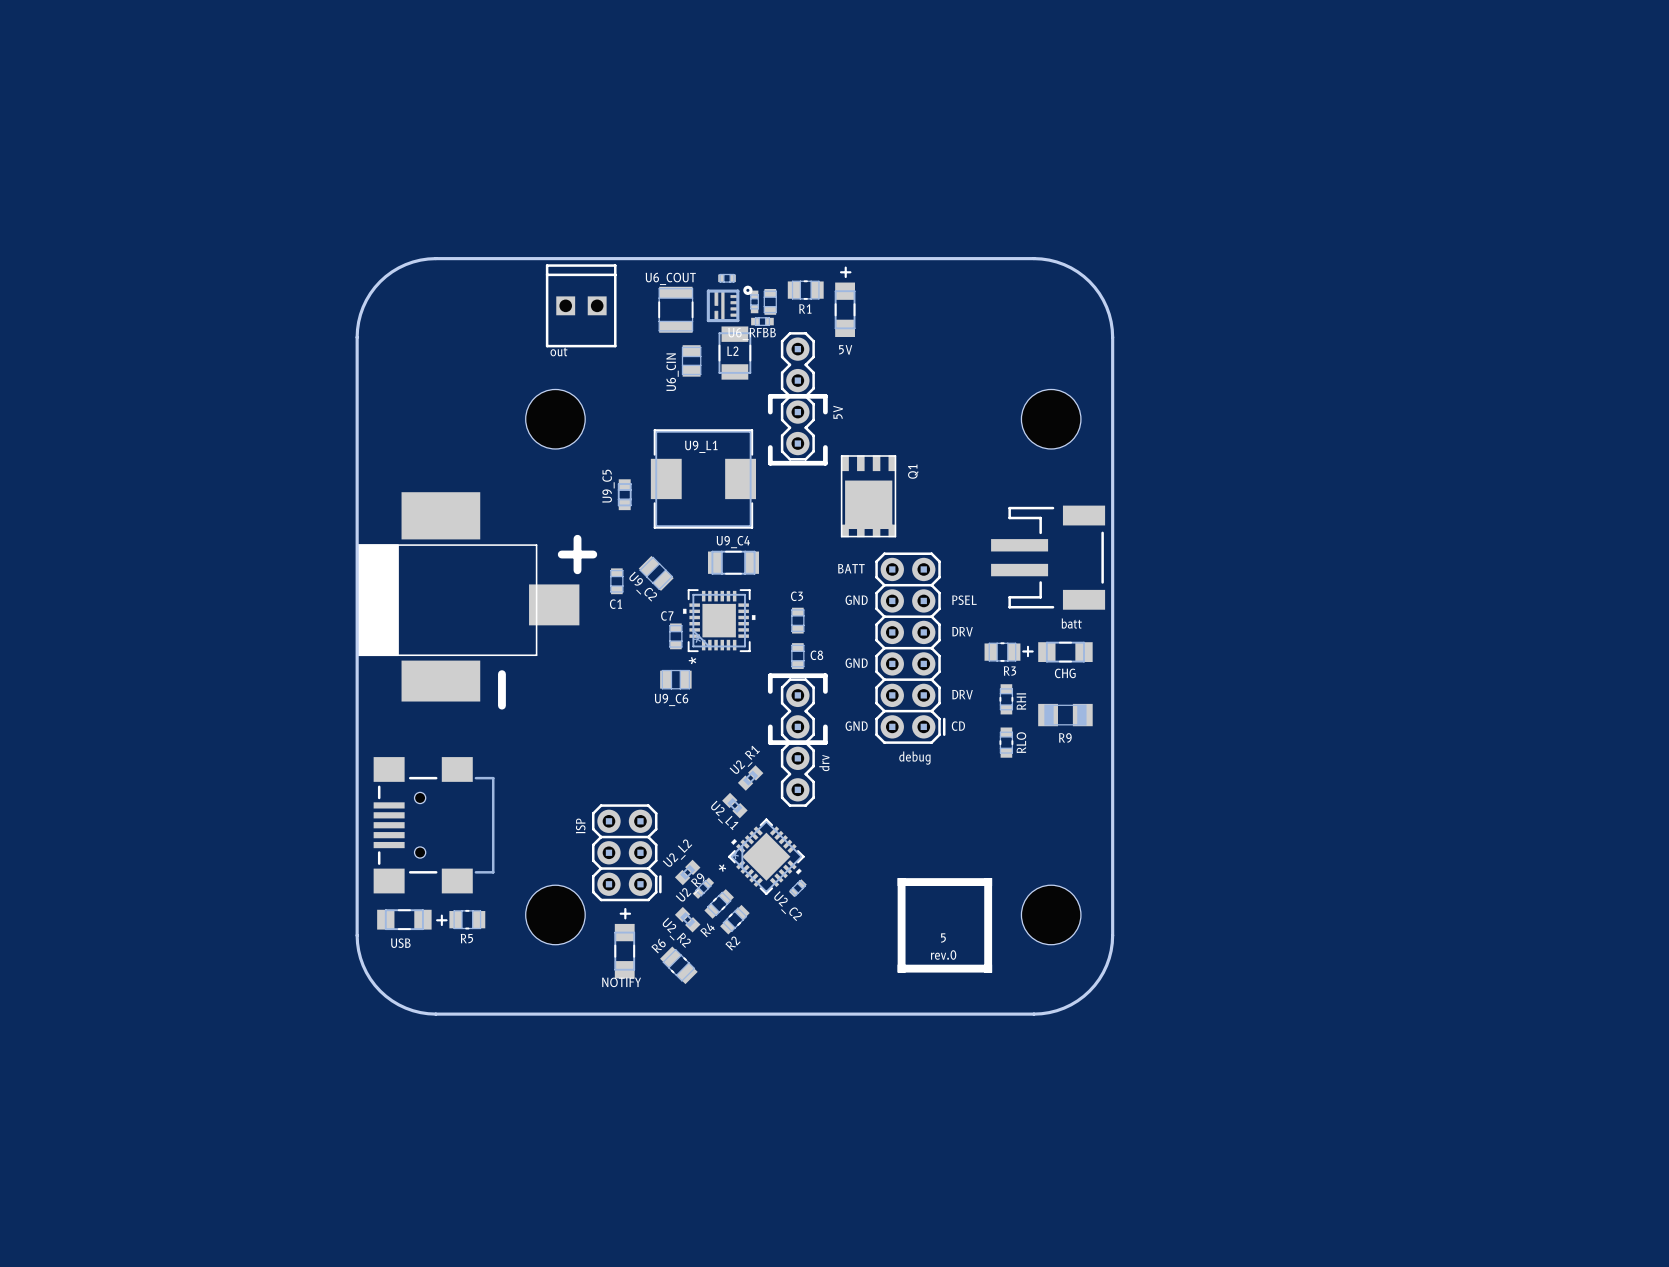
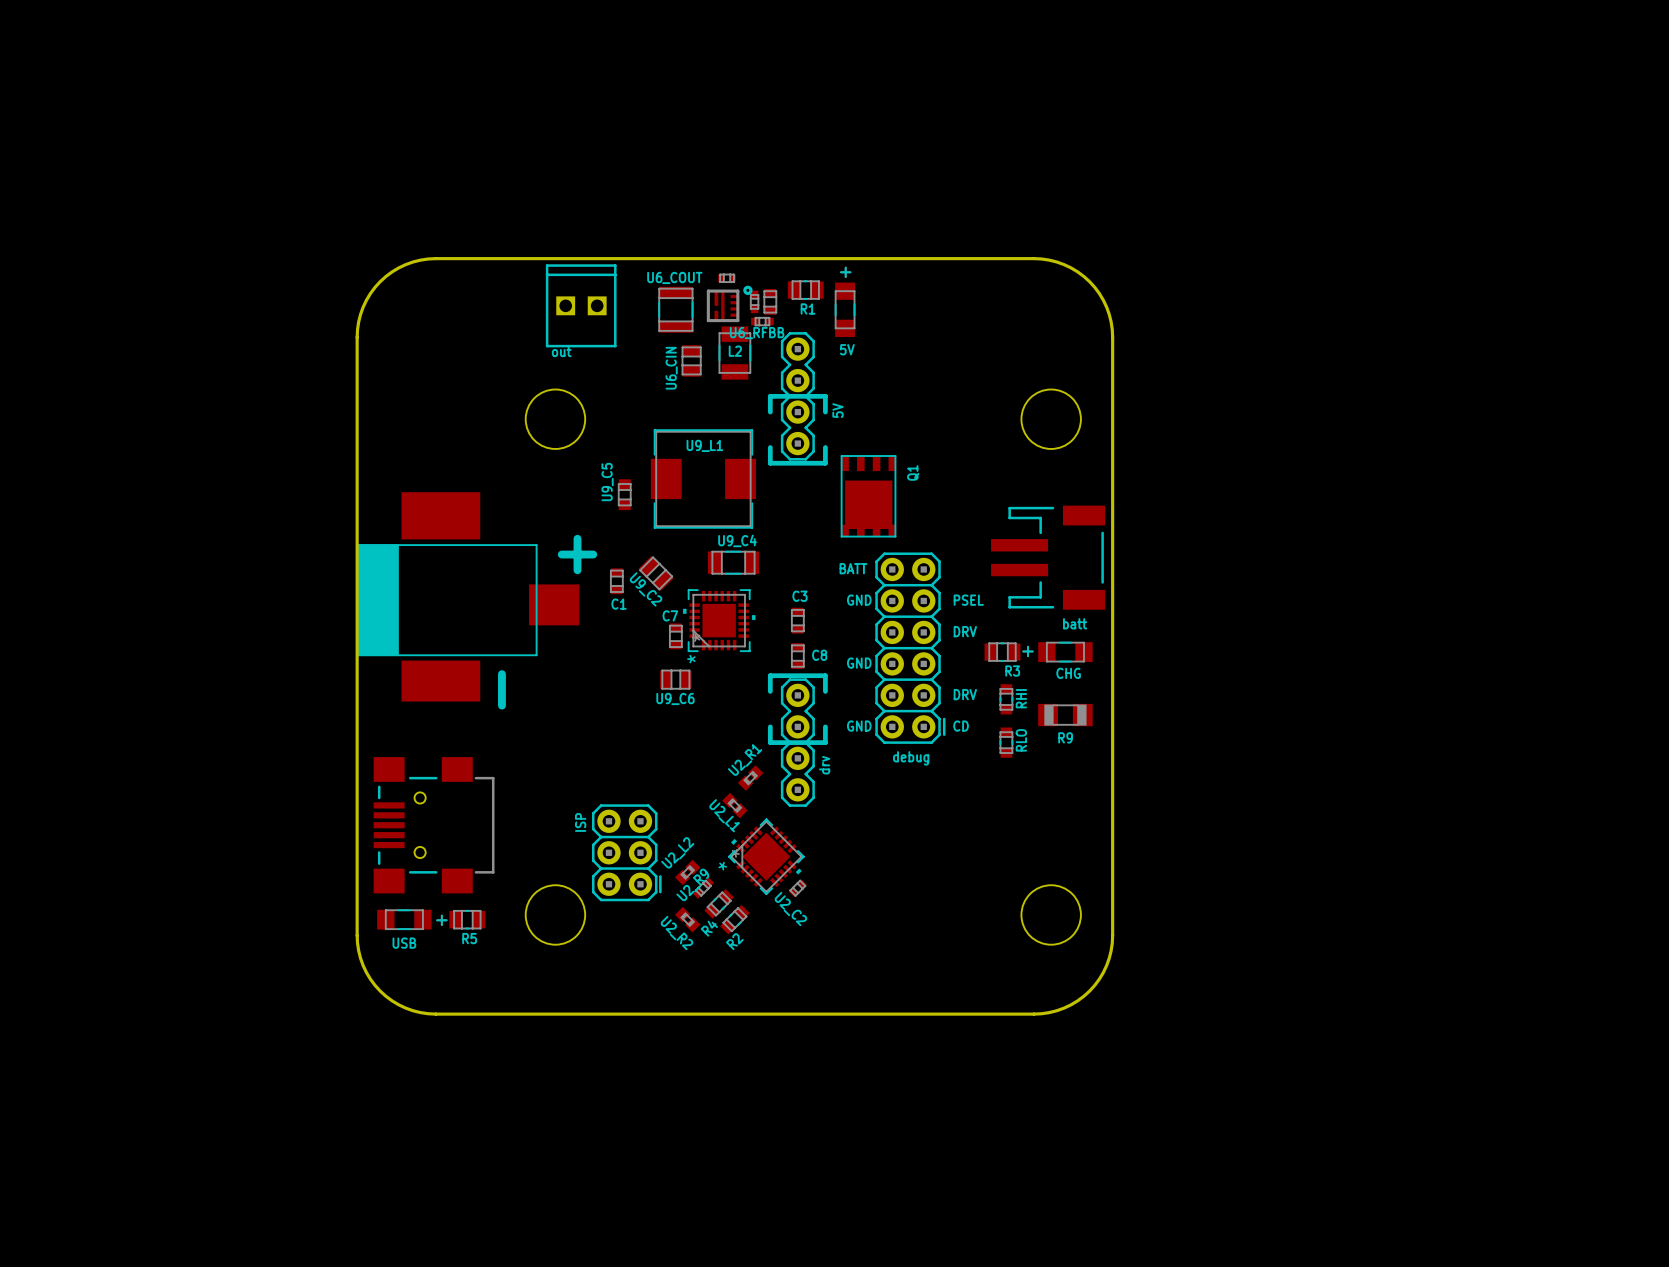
5: rev.0 (944, 925) -> none
NOTIFY: (624, 943) -> none
R6: (678, 965) -> none

